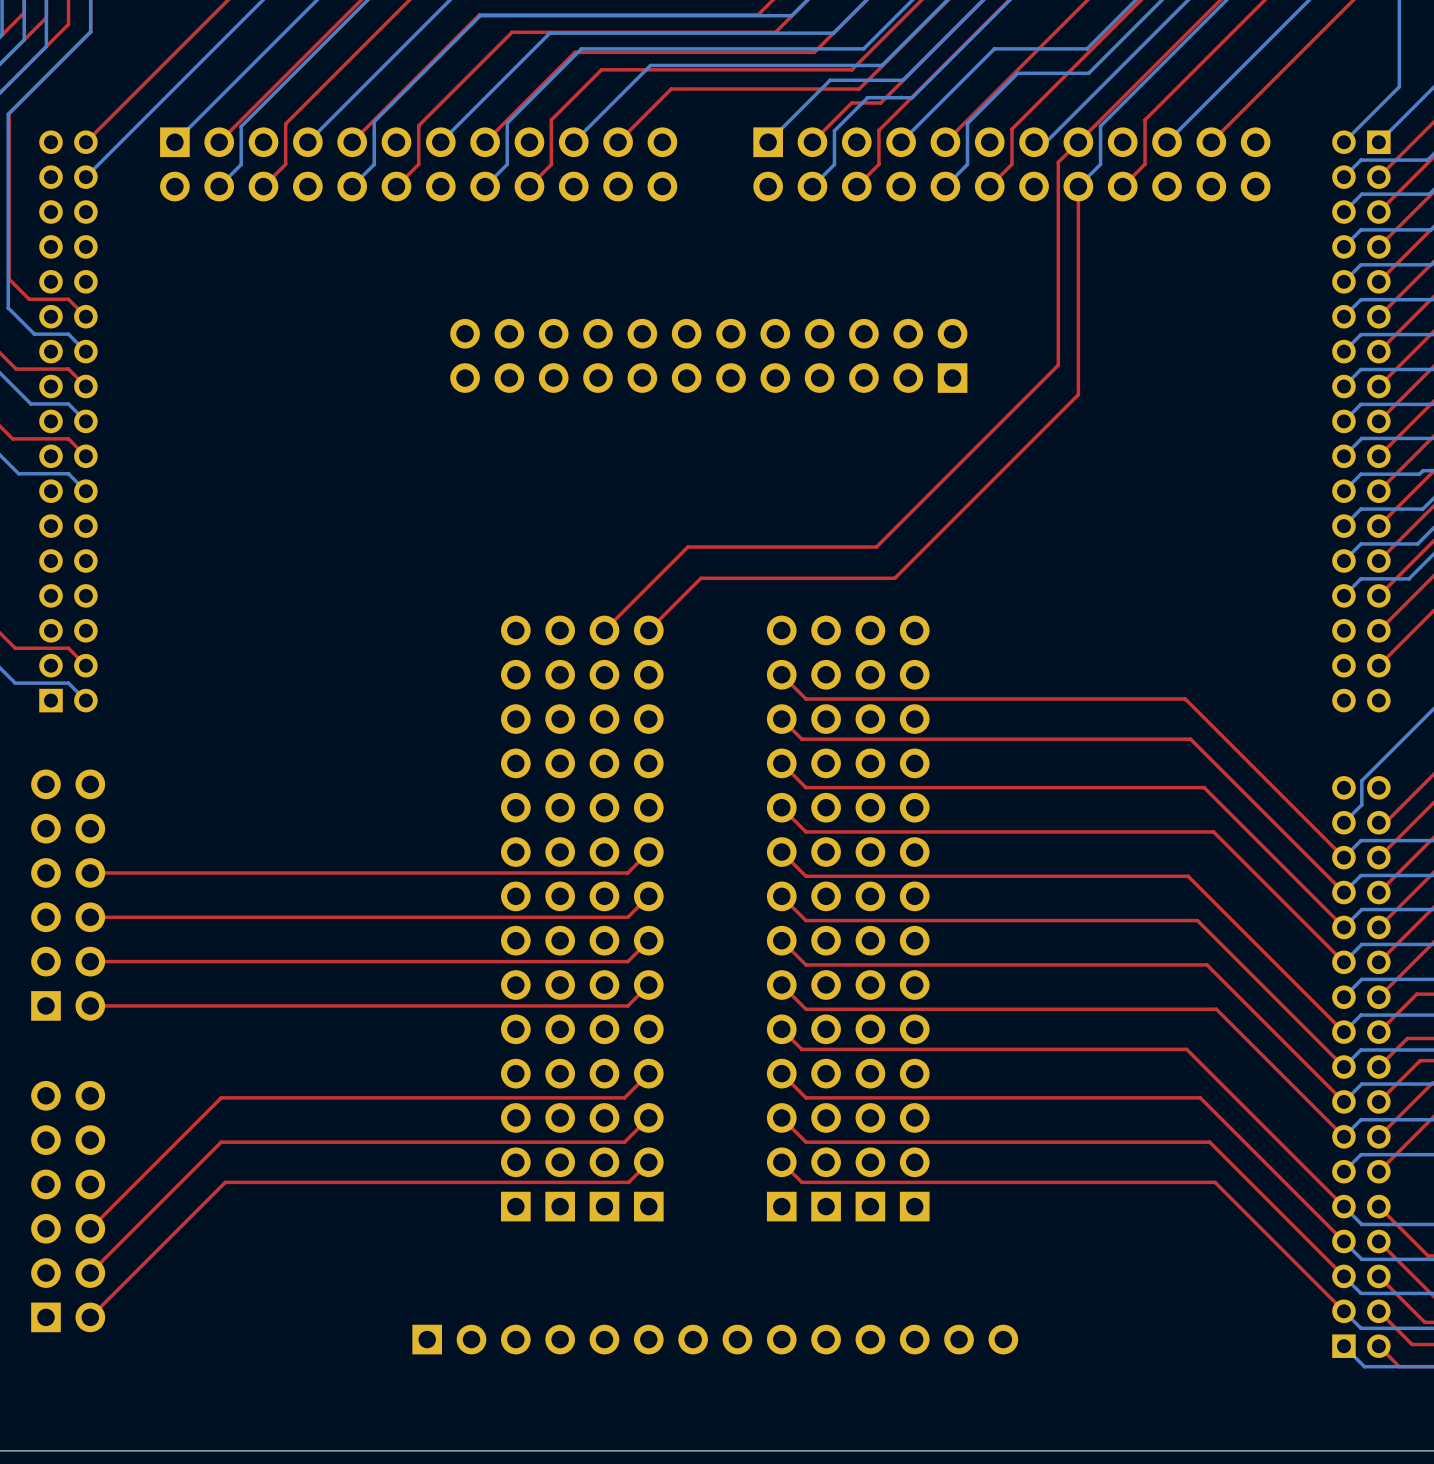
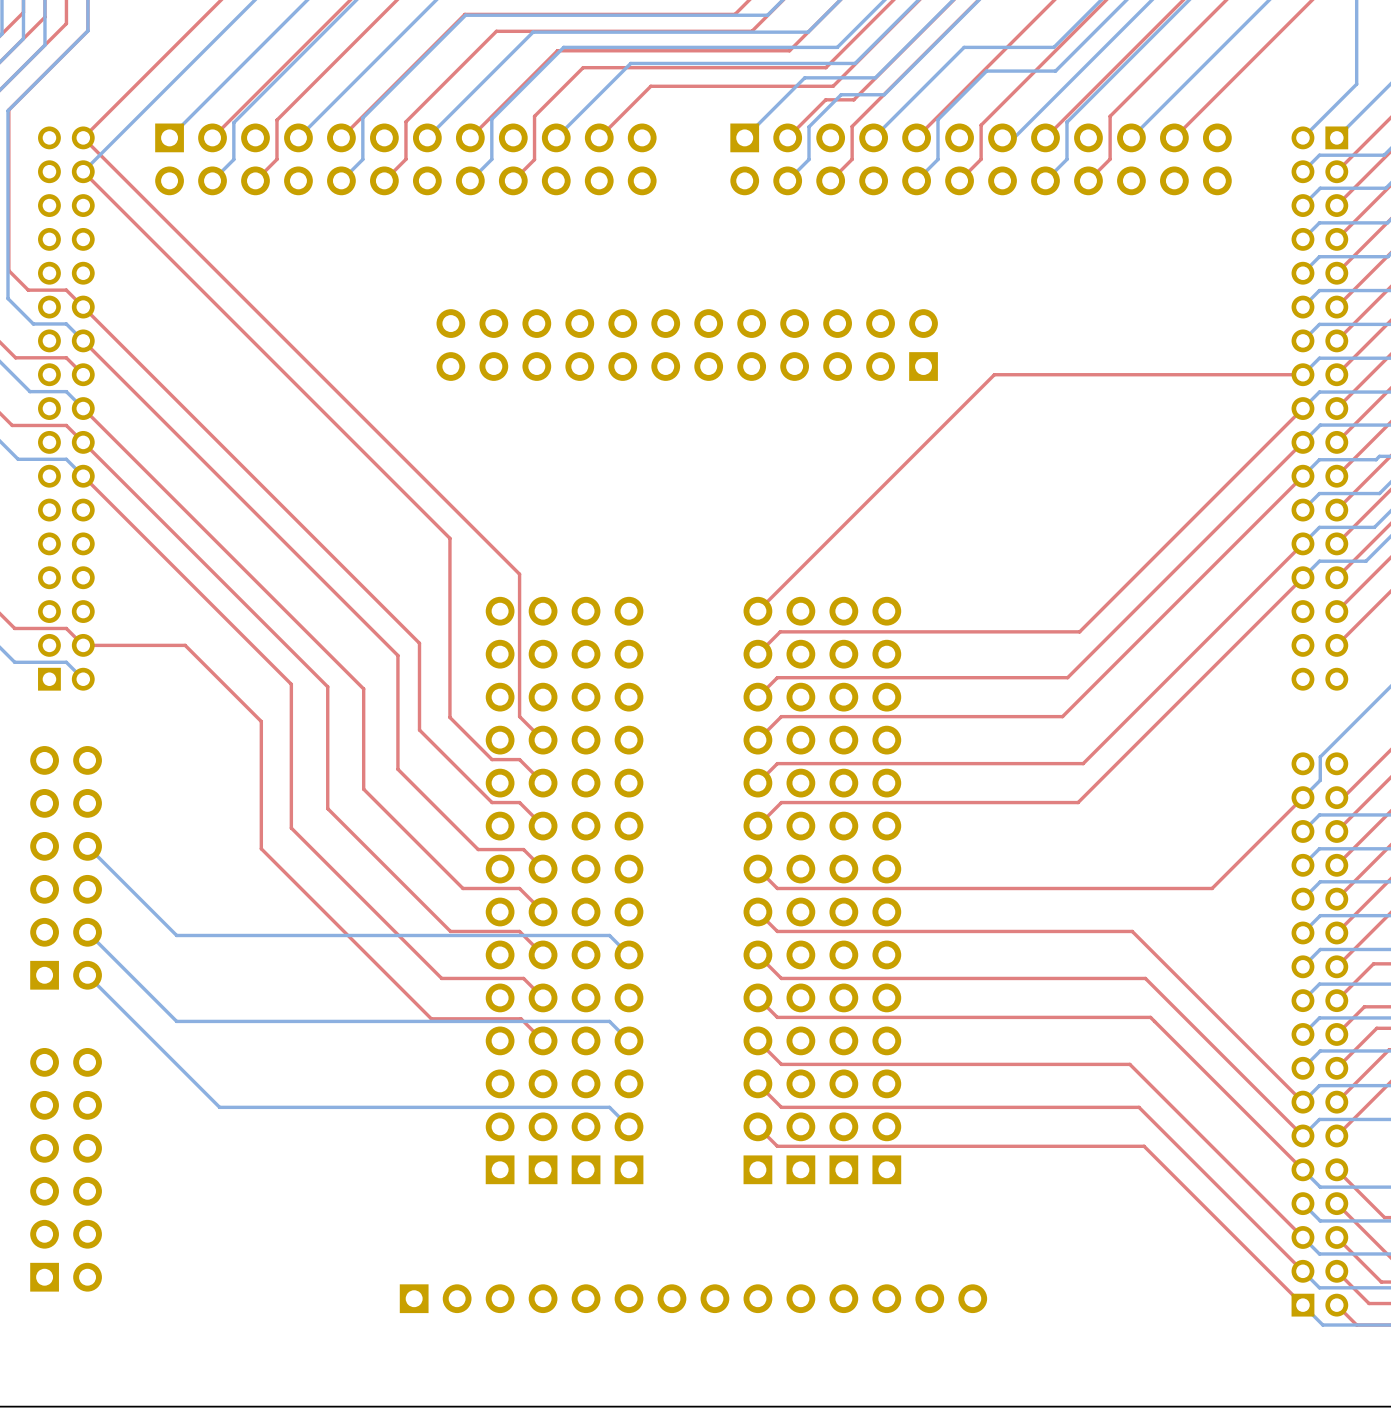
top track: none -> (83, 137) (519, 574) (519, 716) (543, 740)
top track: (1078, 142) (1058, 162) (1058, 365) (876, 547) (687, 547) (604, 630) -> none
top track: none -> (83, 171) (449, 538) (449, 717) (492, 759) (519, 759) (543, 783)
top track: (1078, 186) (1078, 394) (894, 578) (700, 578) (648, 630) -> none
top track: none -> (83, 307) (419, 643) (419, 730) (492, 802) (519, 802) (543, 826)
top track: none -> (83, 340) (397, 655) (397, 769) (478, 849) (523, 849) (543, 869)
top track: none -> (1302, 374) (994, 374) (757, 611)
top track: none -> (83, 408) (363, 688) (363, 789) (462, 888) (519, 888) (543, 911)
top track: none -> (83, 442) (327, 686) (327, 808) (450, 931) (519, 931) (543, 954)
top track: none -> (83, 476) (291, 684) (291, 828) (441, 978) (523, 978) (543, 997)
top track: none -> (83, 645) (185, 645) (261, 721) (261, 848) (431, 1018) (521, 1018) (543, 1040)
top track: (781, 674) (805, 699) -> (757, 654) (780, 631) (1079, 631) (1302, 408)
top track: (1101, 699) (1185, 699) (1343, 857) -> (1067, 677) (1302, 442)
top track: (781, 719) (801, 739) (805, 739) -> (757, 697) (777, 677) (781, 677)
top track: none -> (781, 716) (757, 740)
top track: (1095, 739) (1190, 739) (1343, 892) -> (1062, 716) (1302, 476)
top track: (781, 763) (805, 787) -> (757, 783) (777, 763) (781, 763)
top track: (1117, 787) (1204, 787) (1343, 927) -> (1083, 763) (1302, 543)
top track: (781, 807) (805, 831) (1213, 831) (1343, 962) -> none
top track: (648, 852) (627, 872) (90, 872) -> none
top track: (781, 852) (805, 876) (1188, 876) (1343, 1032) -> (757, 826) (781, 802) (1078, 802) (1302, 577)
bottom track: none -> (87, 846) (176, 935) (609, 935) (629, 954)
top track: (648, 896) (627, 917) (90, 917) -> none
top track: (801, 916) (805, 920) (1197, 920) (1343, 1067) -> (777, 888) (1212, 888) (1302, 797)
top track: (648, 940) (627, 961) (90, 961) -> none
top track: (801, 960) (805, 964) (1206, 964) (1343, 1101) -> (777, 931) (1132, 931) (1179, 978)
bottom track: none -> (87, 932) (176, 1021) (609, 1021) (629, 1040)
top track: (648, 985) (627, 1005) (90, 1005) -> none
bottom track: none -> (87, 975) (219, 1107) (609, 1107) (629, 1126)
top track: (1216, 1009) (1181, 1009) -> (1302, 1135) (1145, 978)
top track: (648, 1073) (624, 1097) (221, 1097) (90, 1228) -> none
top track: (1165, 1097) (1200, 1097) (1343, 1241) -> (1129, 1064) (1172, 1107)
top track: (648, 1117) (624, 1142) (221, 1142) (90, 1273) -> none
top track: (1209, 1142) (1174, 1142) -> (1177, 1146) (1139, 1107)
top track: (648, 1162) (628, 1182) (225, 1182) (90, 1317) -> none
top track: (1215, 1182) (1180, 1182) -> (1302, 1305) (1144, 1146)

